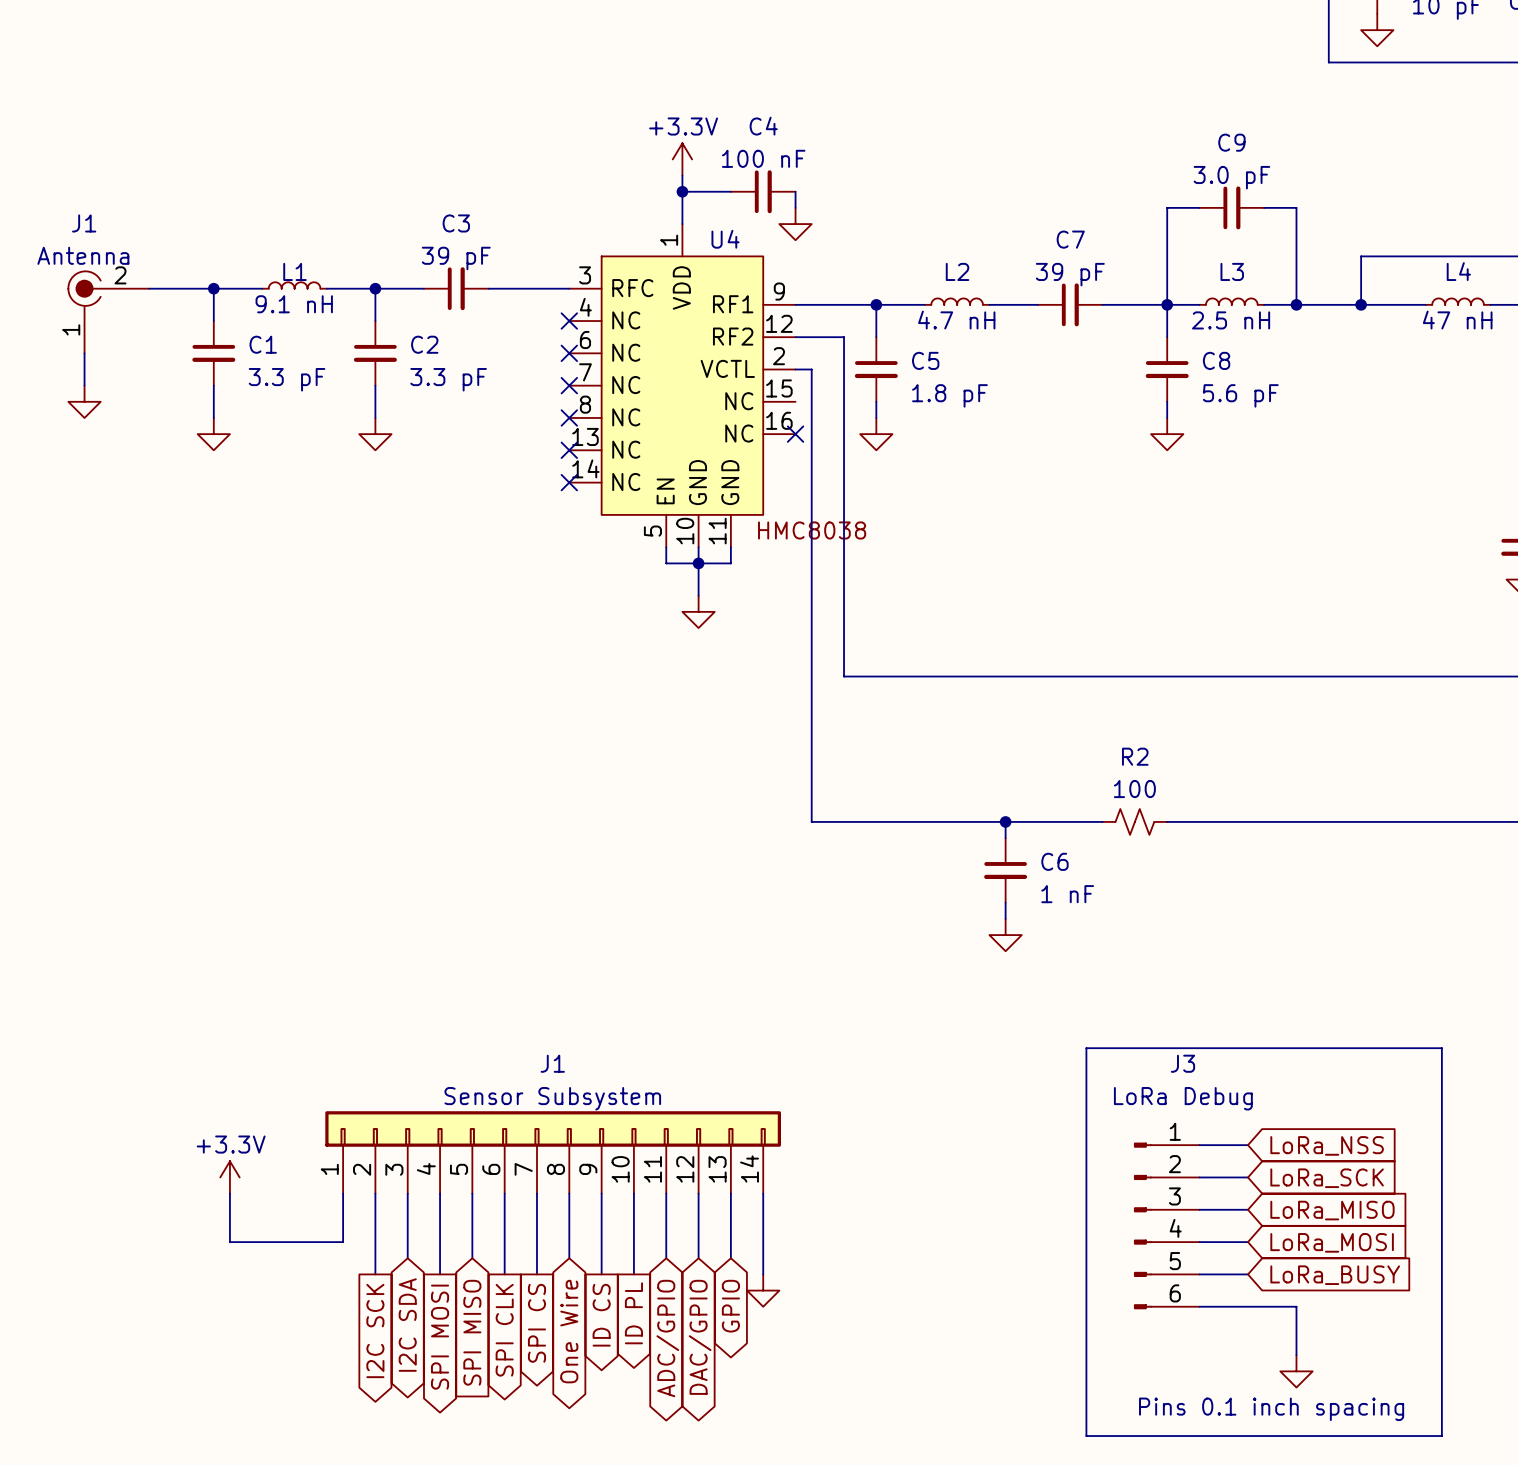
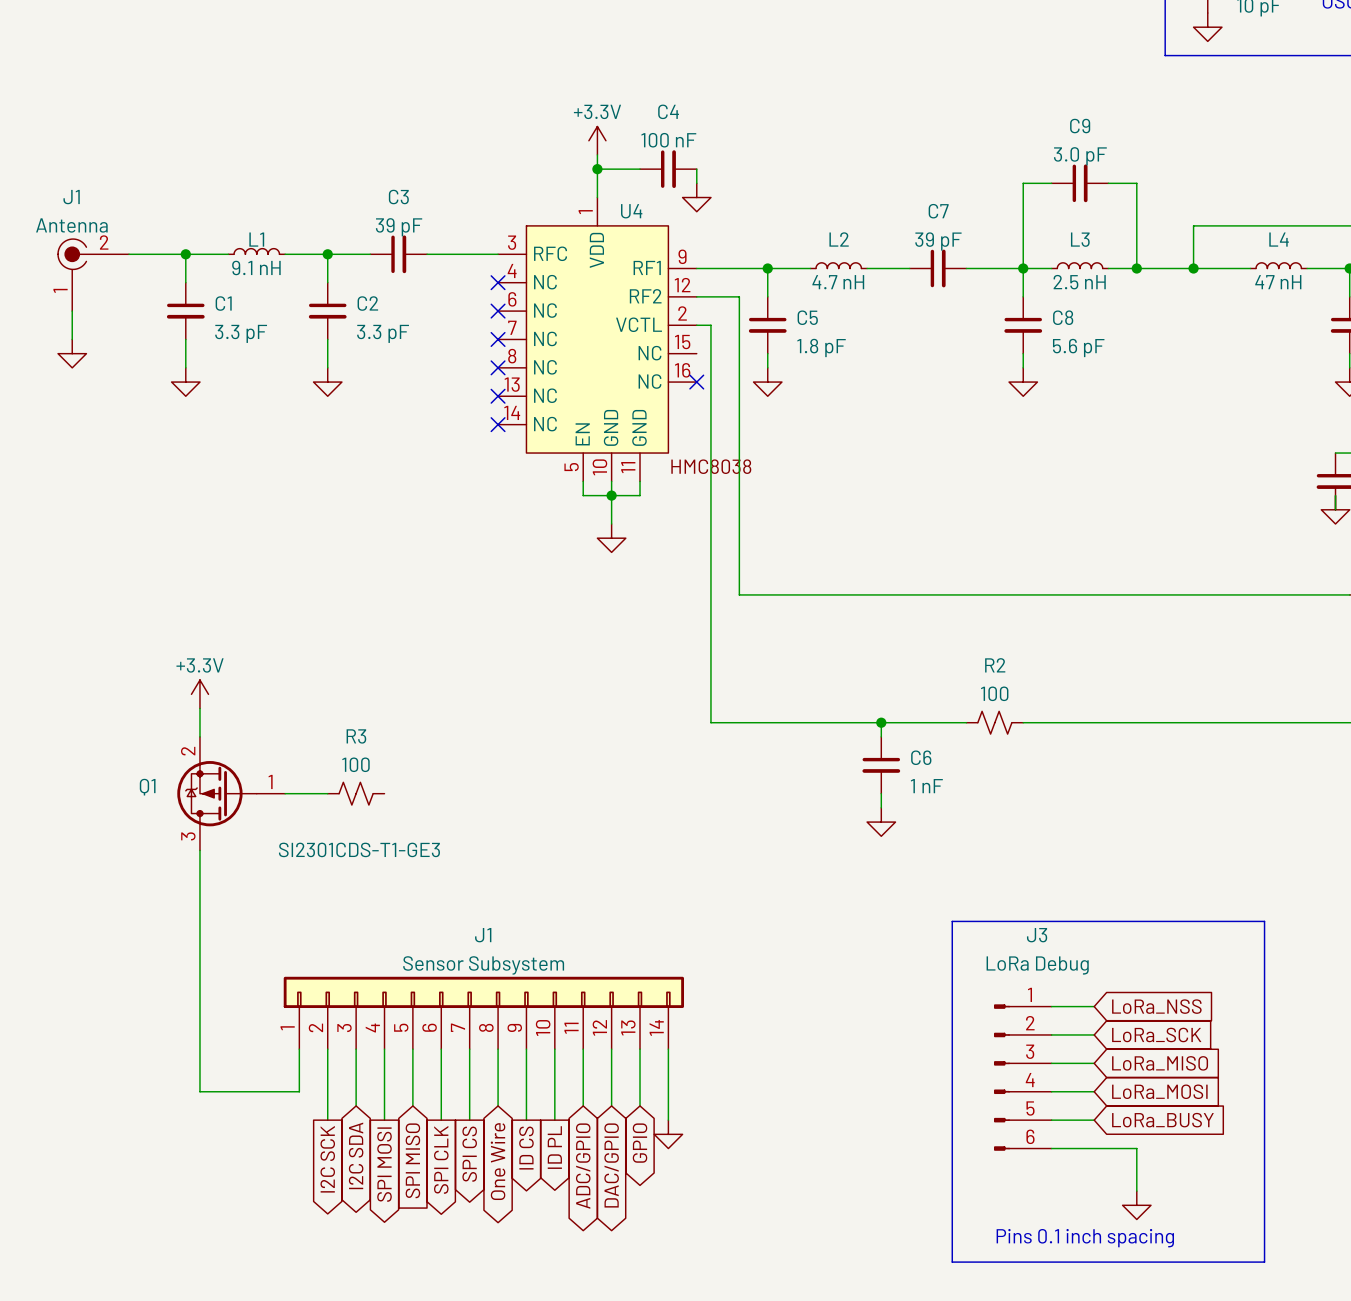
power symbol: none -> +3.3V (199, 694)
wire: none -> (199, 708) (199, 736)
Q1: none -> SI2301CDS-T1-GE3 (231, 793)
wire: none -> (285, 793) (327, 793)
R3: none -> 100 (356, 793)
wire: none -> (199, 850) (199, 1049)
power symbol: +3.3V (229, 1177) -> none

